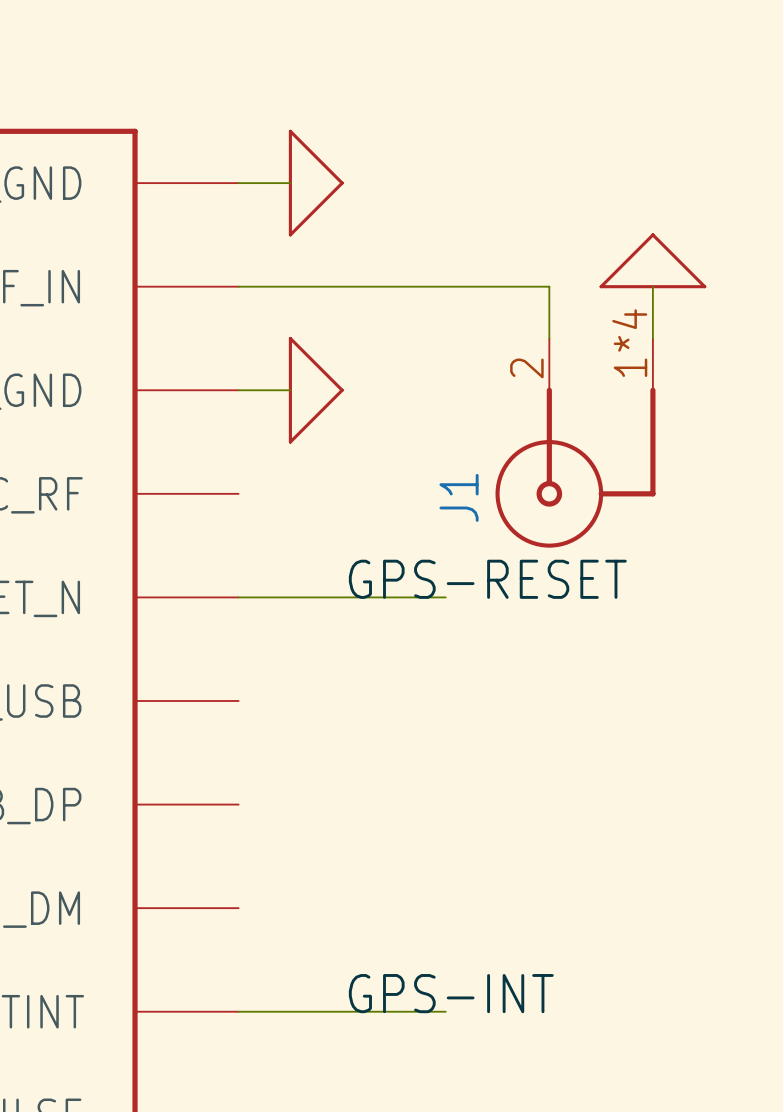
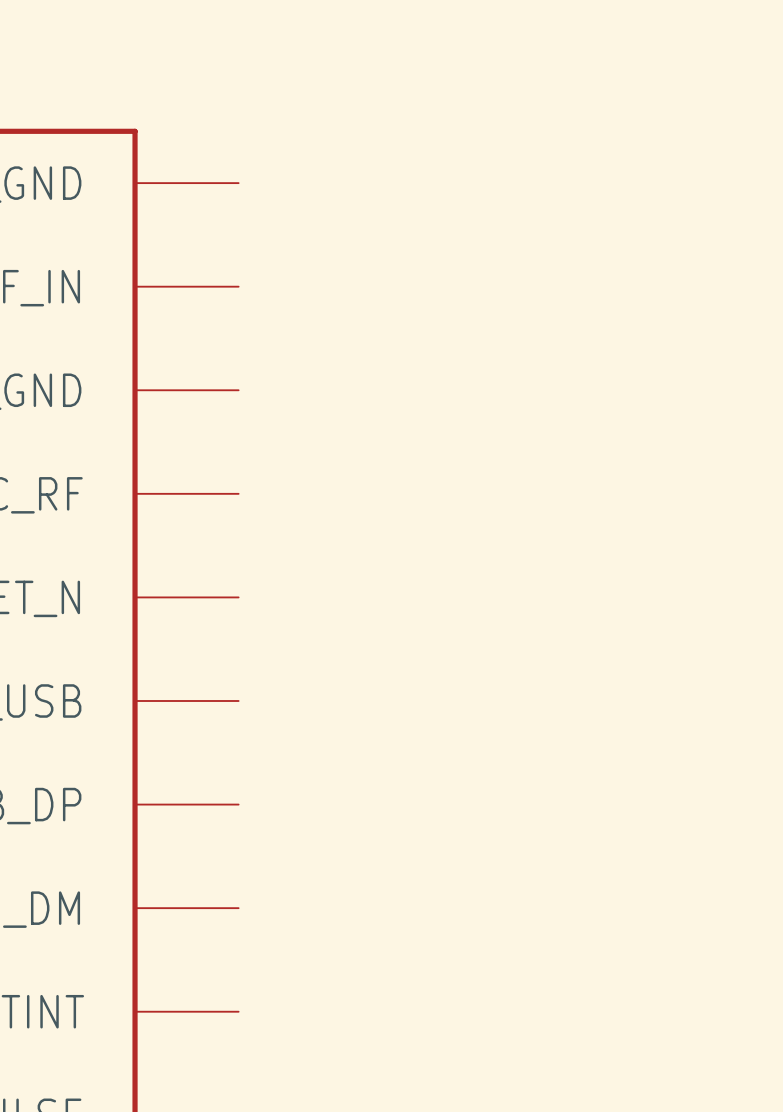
wire: (238, 183) (290, 183) -> none
power symbol: (316, 183) -> none
power symbol: (652, 260) -> none
wire: (238, 286) (549, 286) (549, 338) -> none
wire: (652, 286) (652, 338) -> none
wire: (238, 390) (290, 390) -> none
power symbol: (316, 390) -> none
J1: (575, 443) -> none
label: GPS-RESET (487, 579) -> none
wire: (238, 597) (445, 597) -> none
label: GPS-INT (451, 993) -> none
wire: (238, 1011) (445, 1011) -> none

